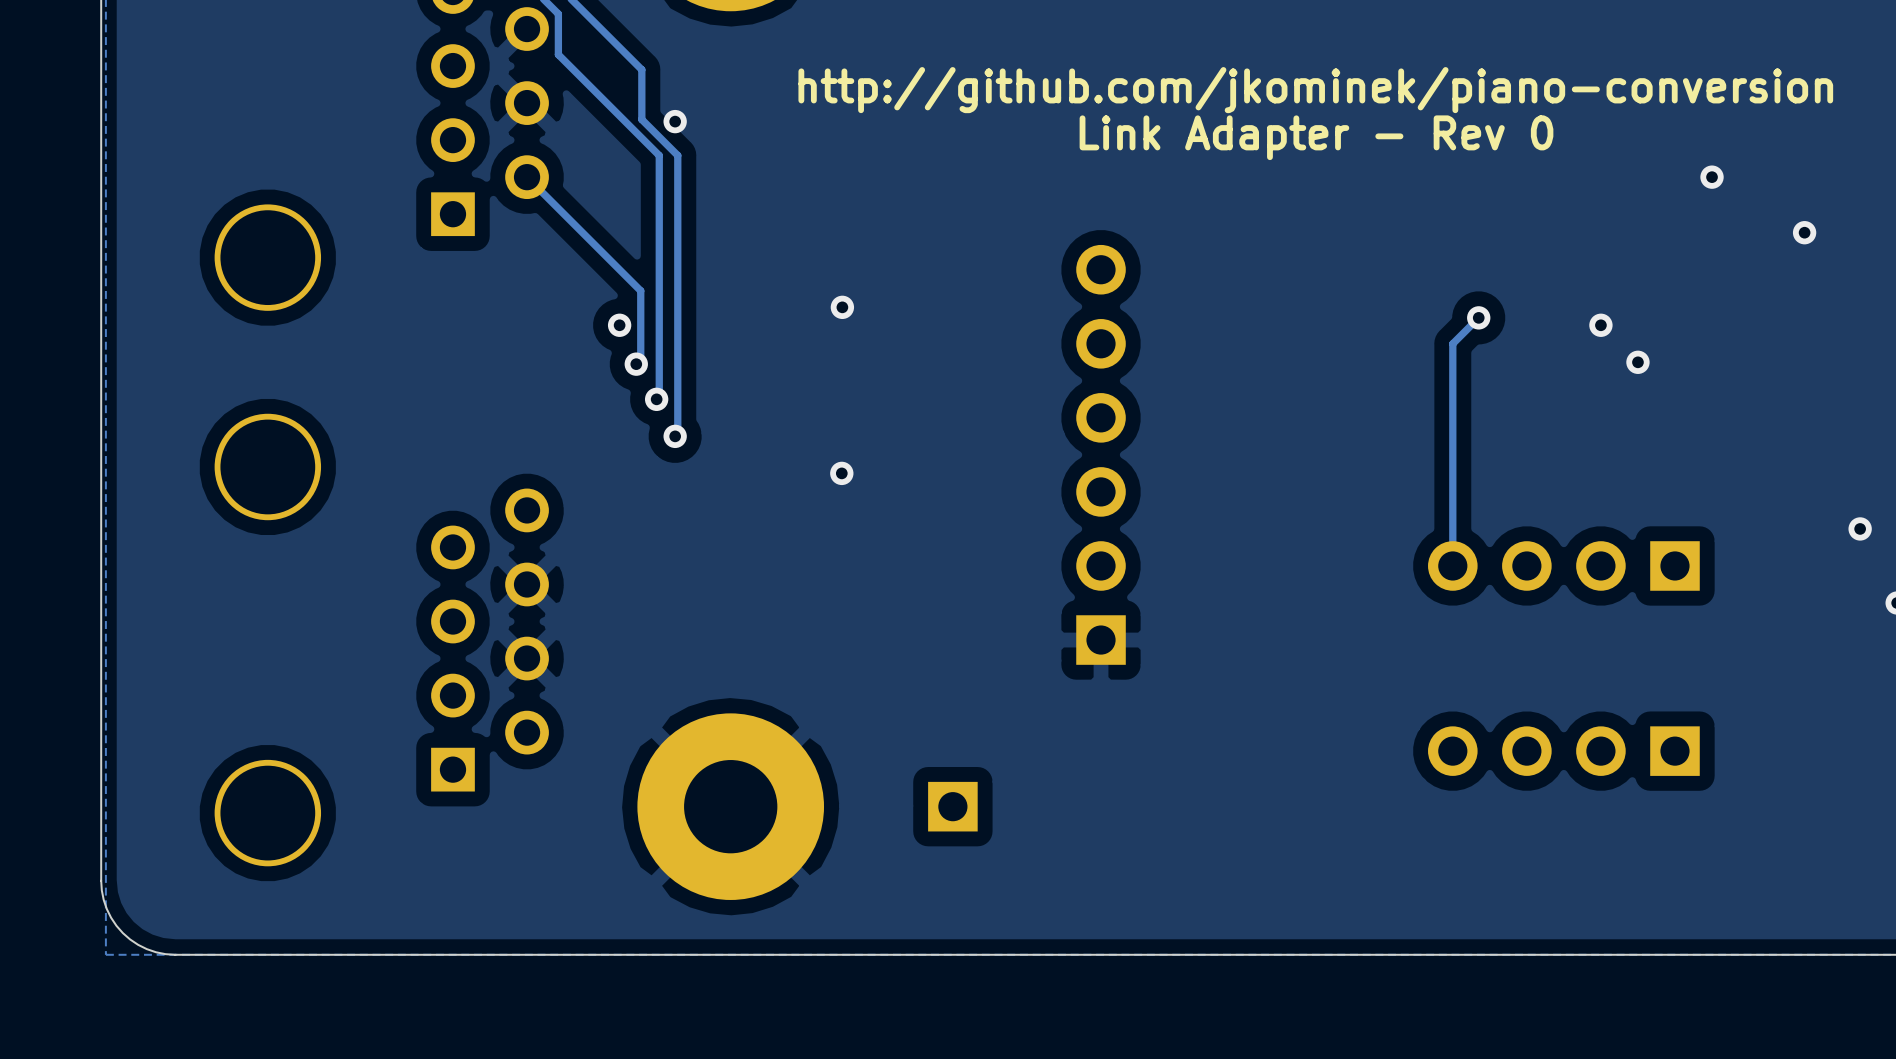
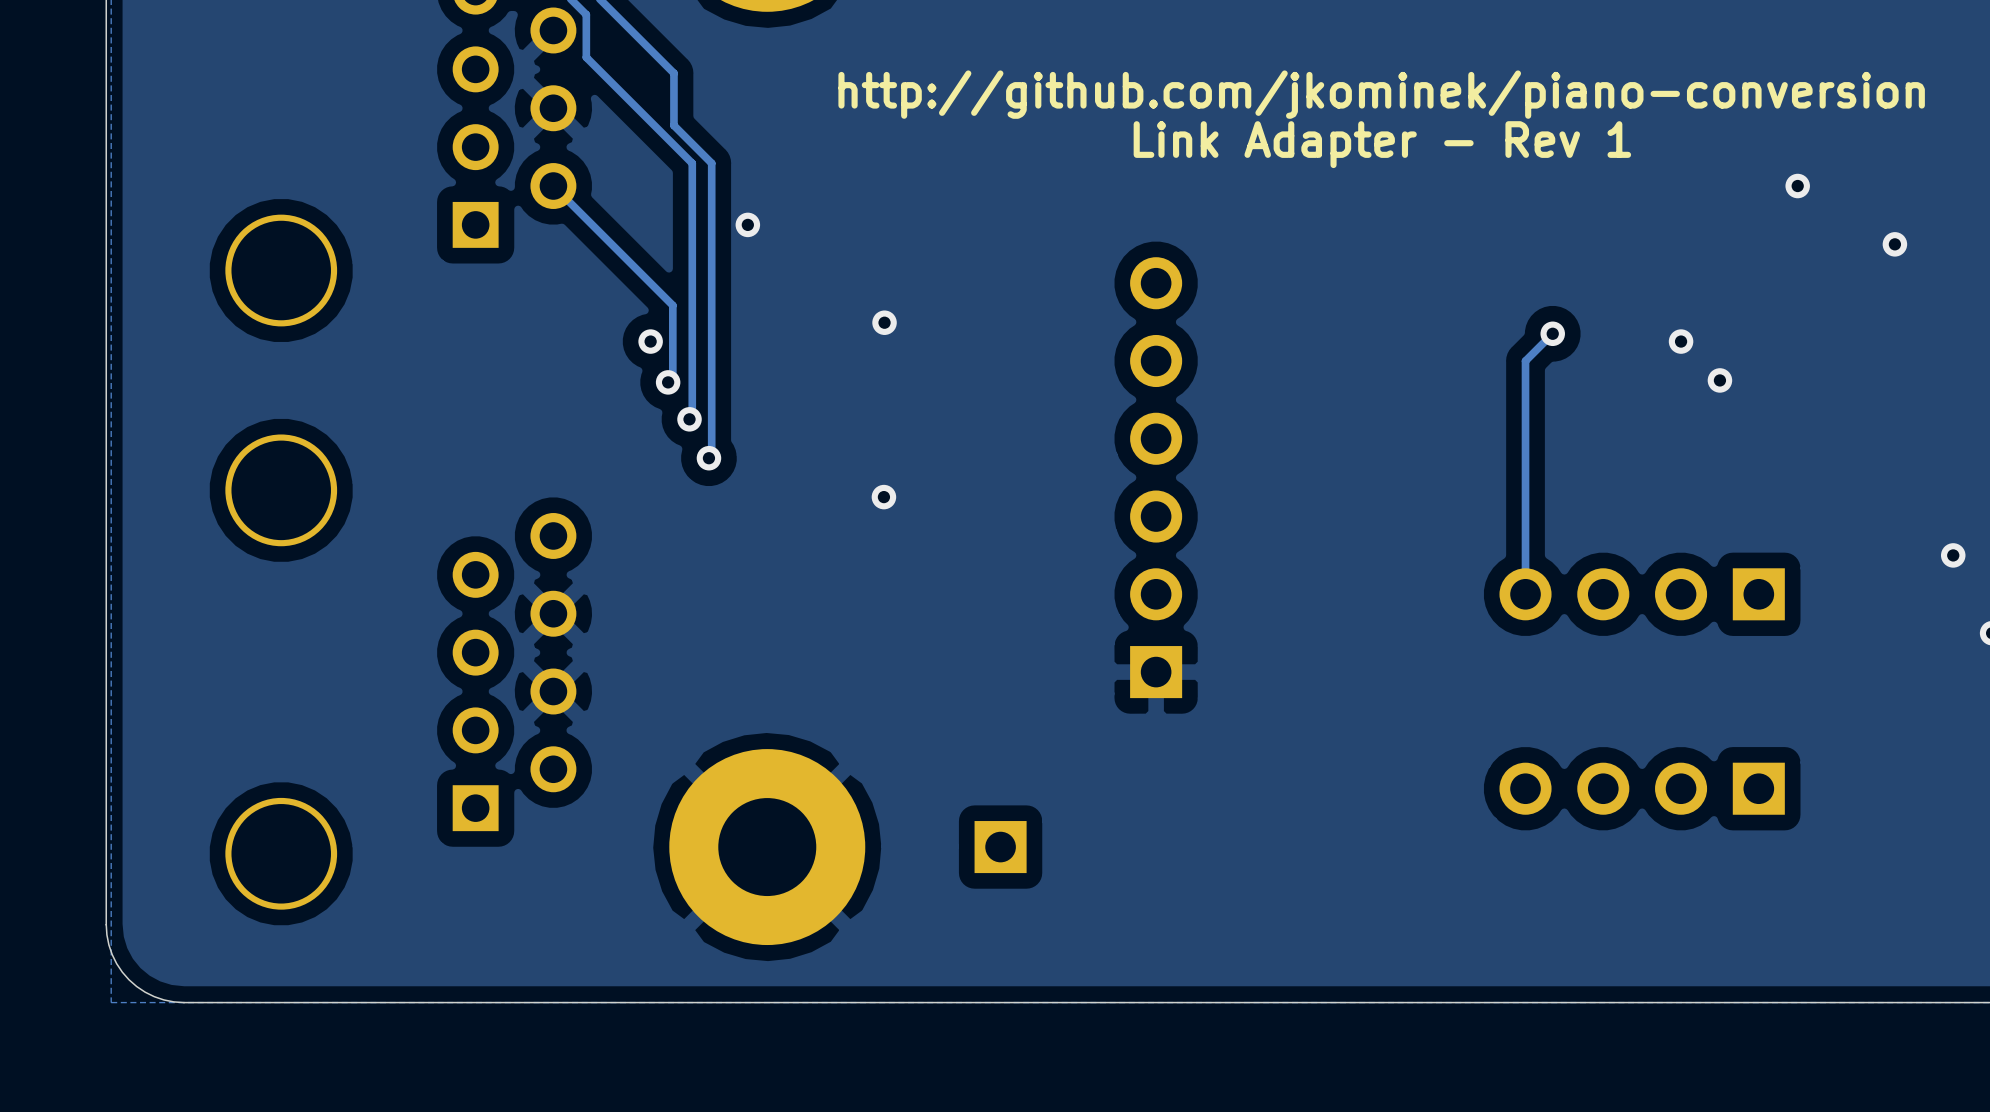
via position: (675, 121) -> (747, 224)
text: Link Adapter - Rev 0 (1316, 137) -> Link Adapter - Rev 1 (1382, 144)

